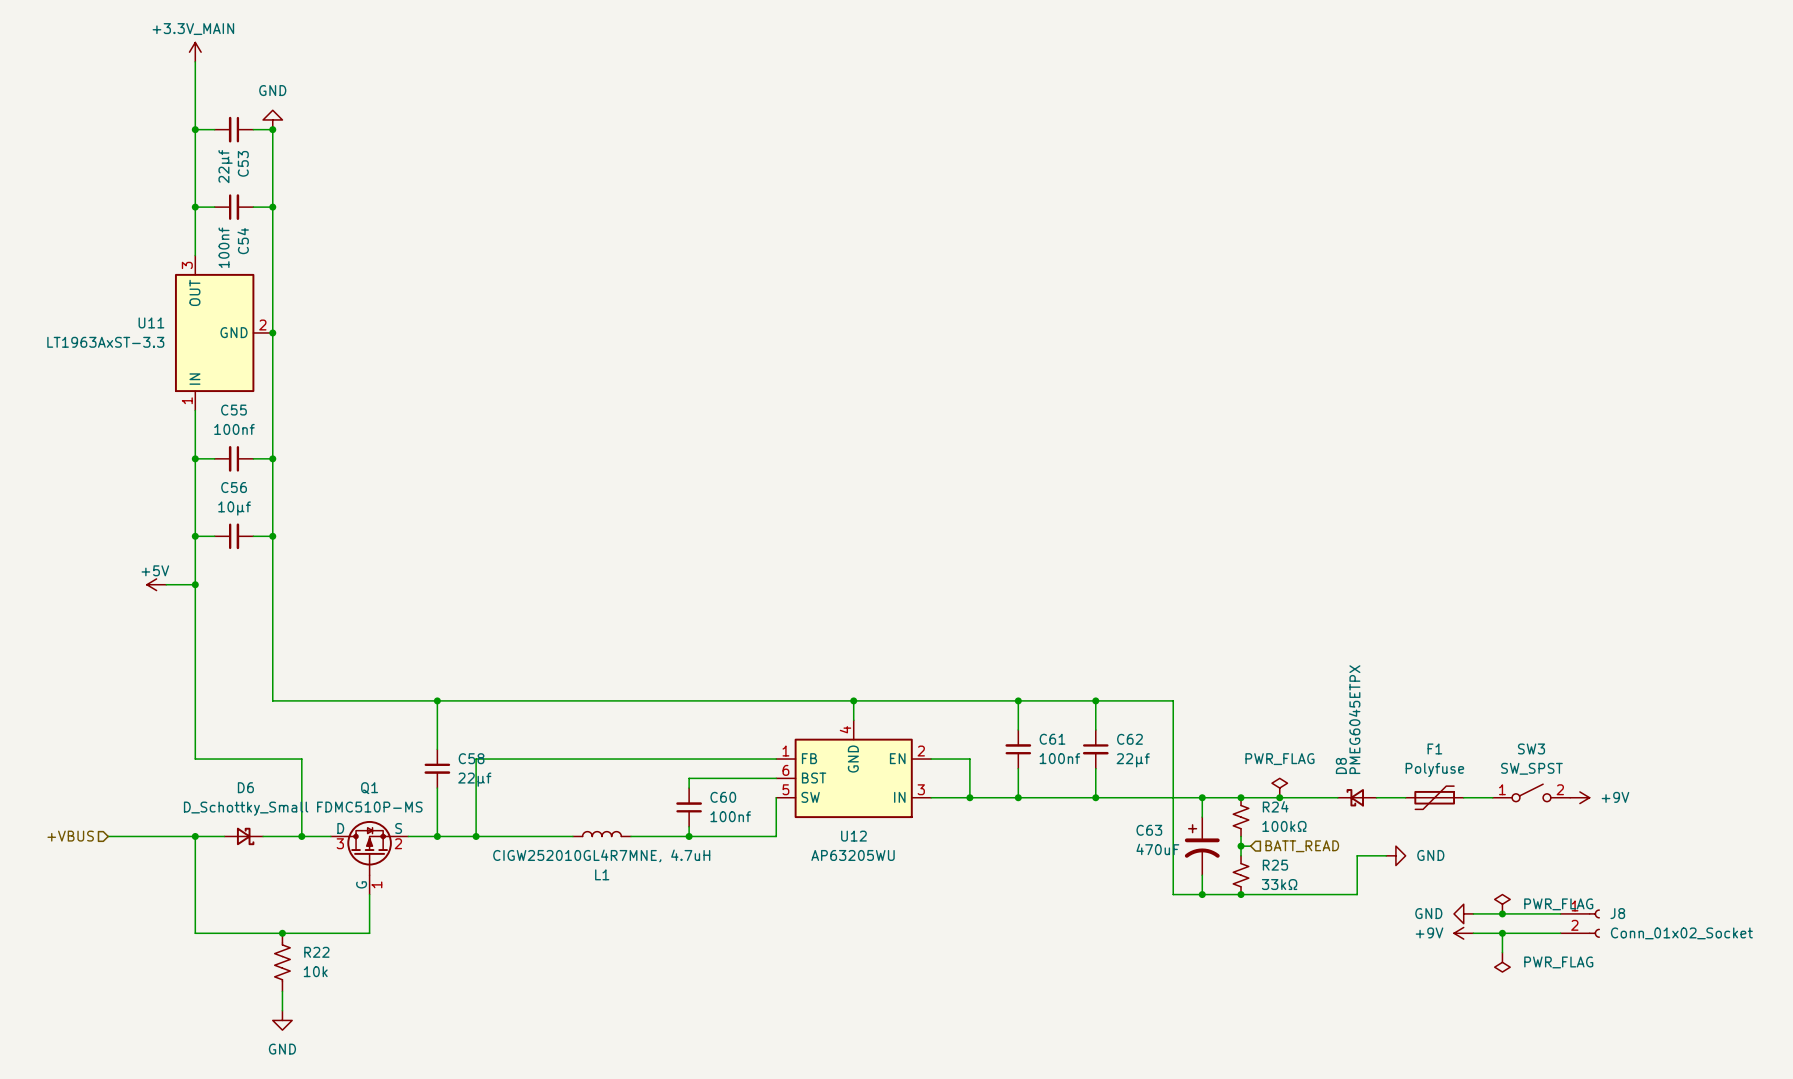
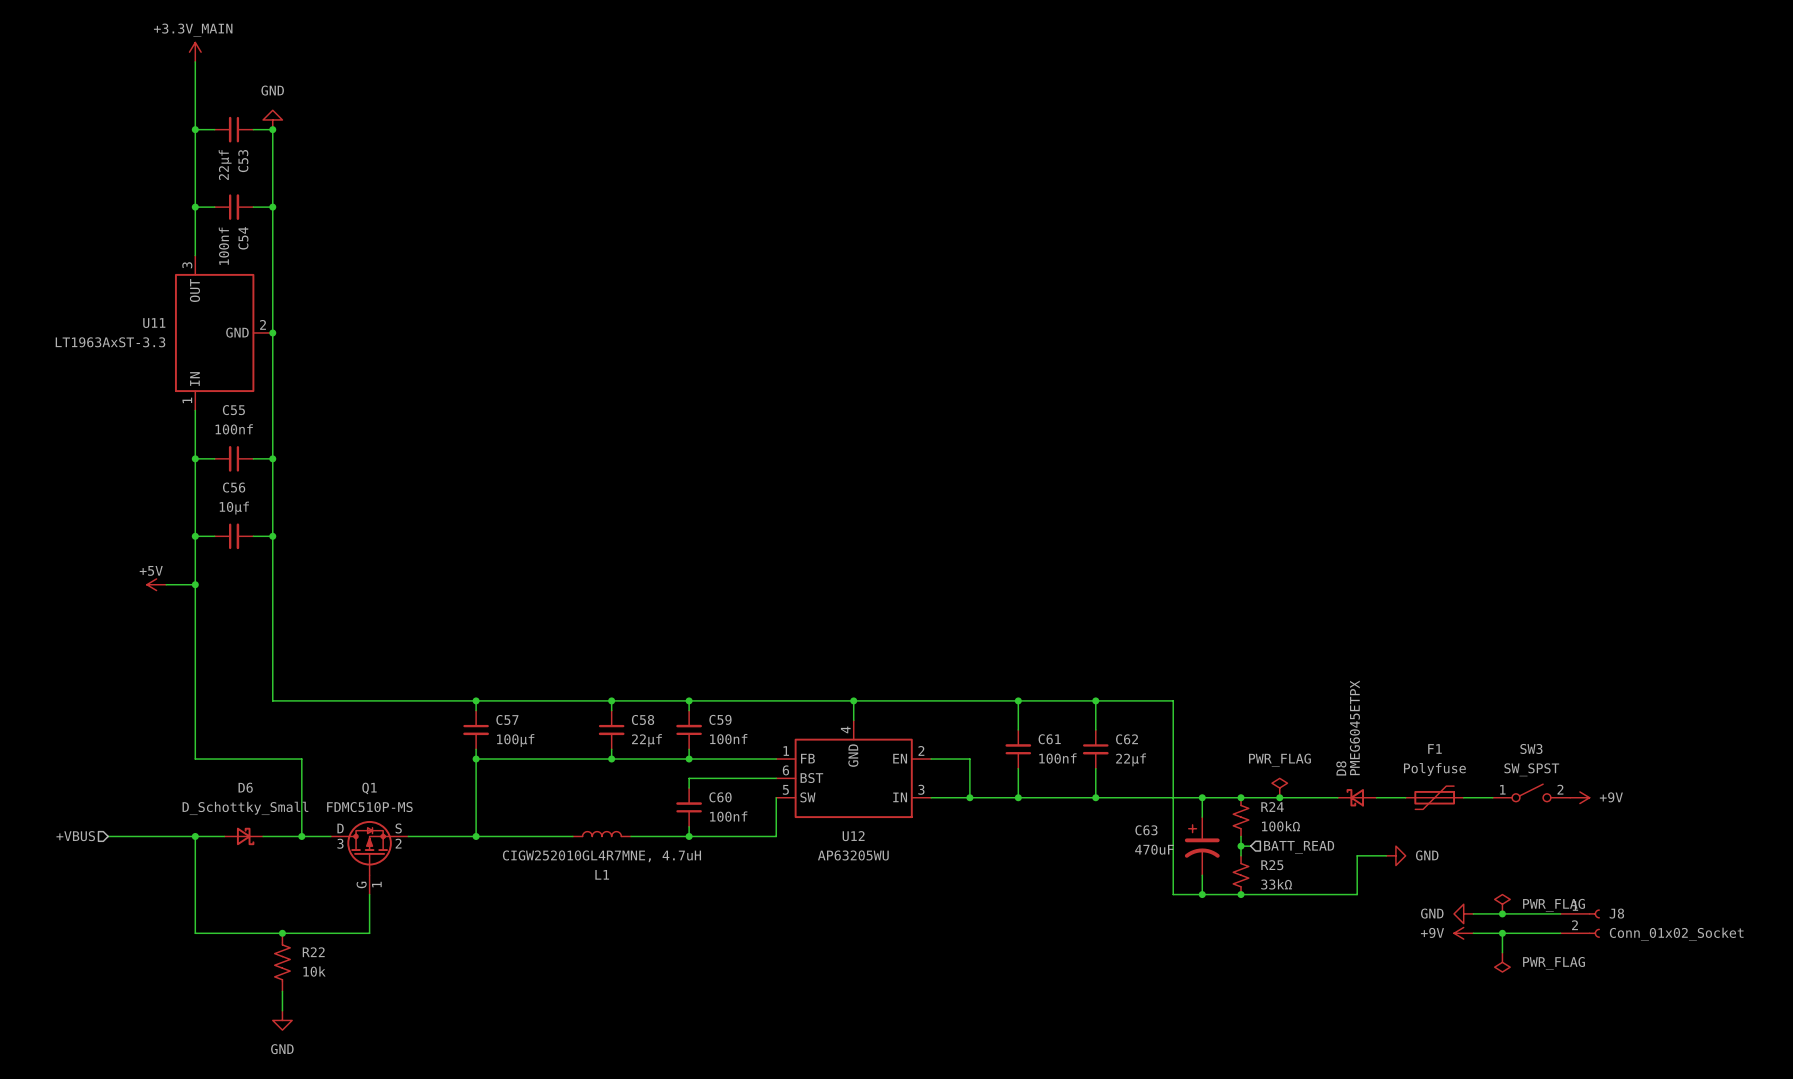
wire: (437, 700) (437, 749) -> none
junction: (437, 700) -> none
wire: none -> (476, 700) (476, 710)
junction: none -> (476, 700)
wire: none -> (611, 700) (611, 710)
junction: none -> (611, 700)
wire: none -> (689, 700) (689, 710)
junction: none -> (689, 700)
C57: none -> 100μf (476, 729)
C59: none -> 100nf (689, 729)
wire: none -> (476, 749) (476, 759)
wire: none -> (611, 749) (611, 759)
wire: none -> (689, 749) (689, 759)
junction: none -> (476, 759)
junction: none -> (611, 759)
junction: none -> (689, 759)
C58 position: (437, 768) -> (611, 729)
wire: (437, 788) (437, 836) -> none
junction: (437, 836) -> none

